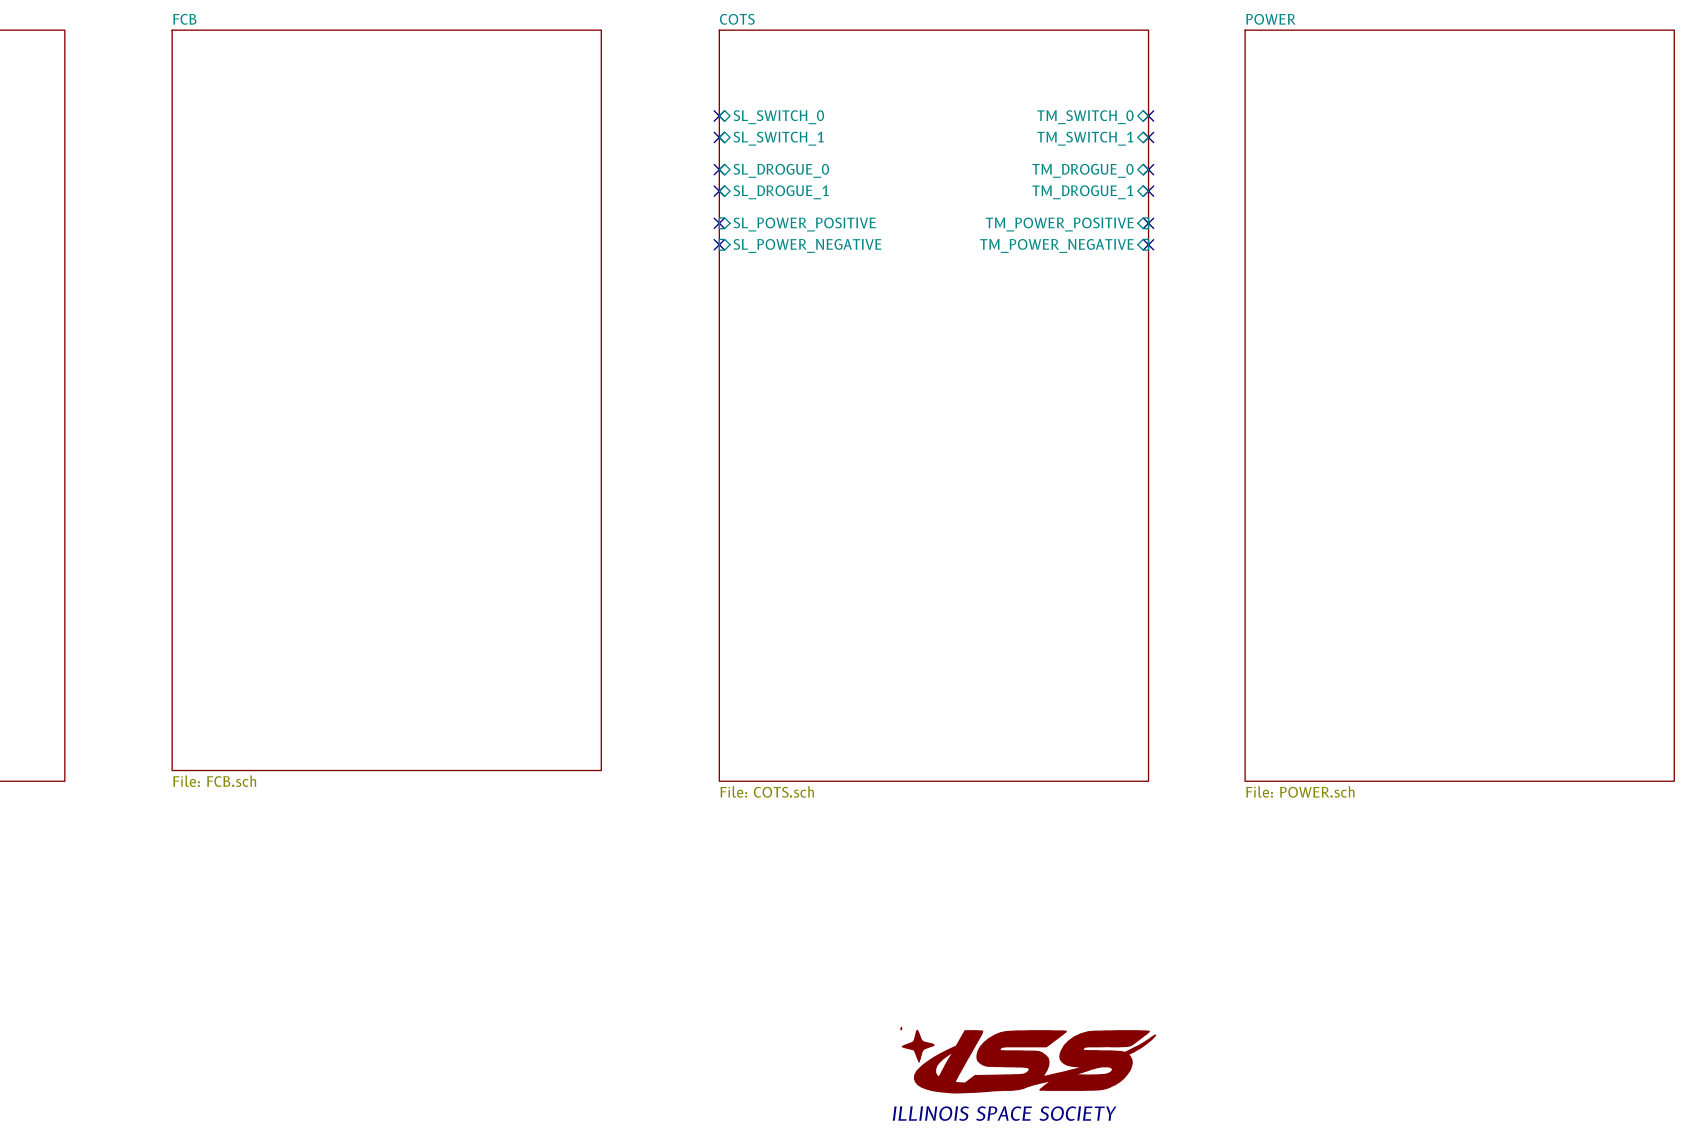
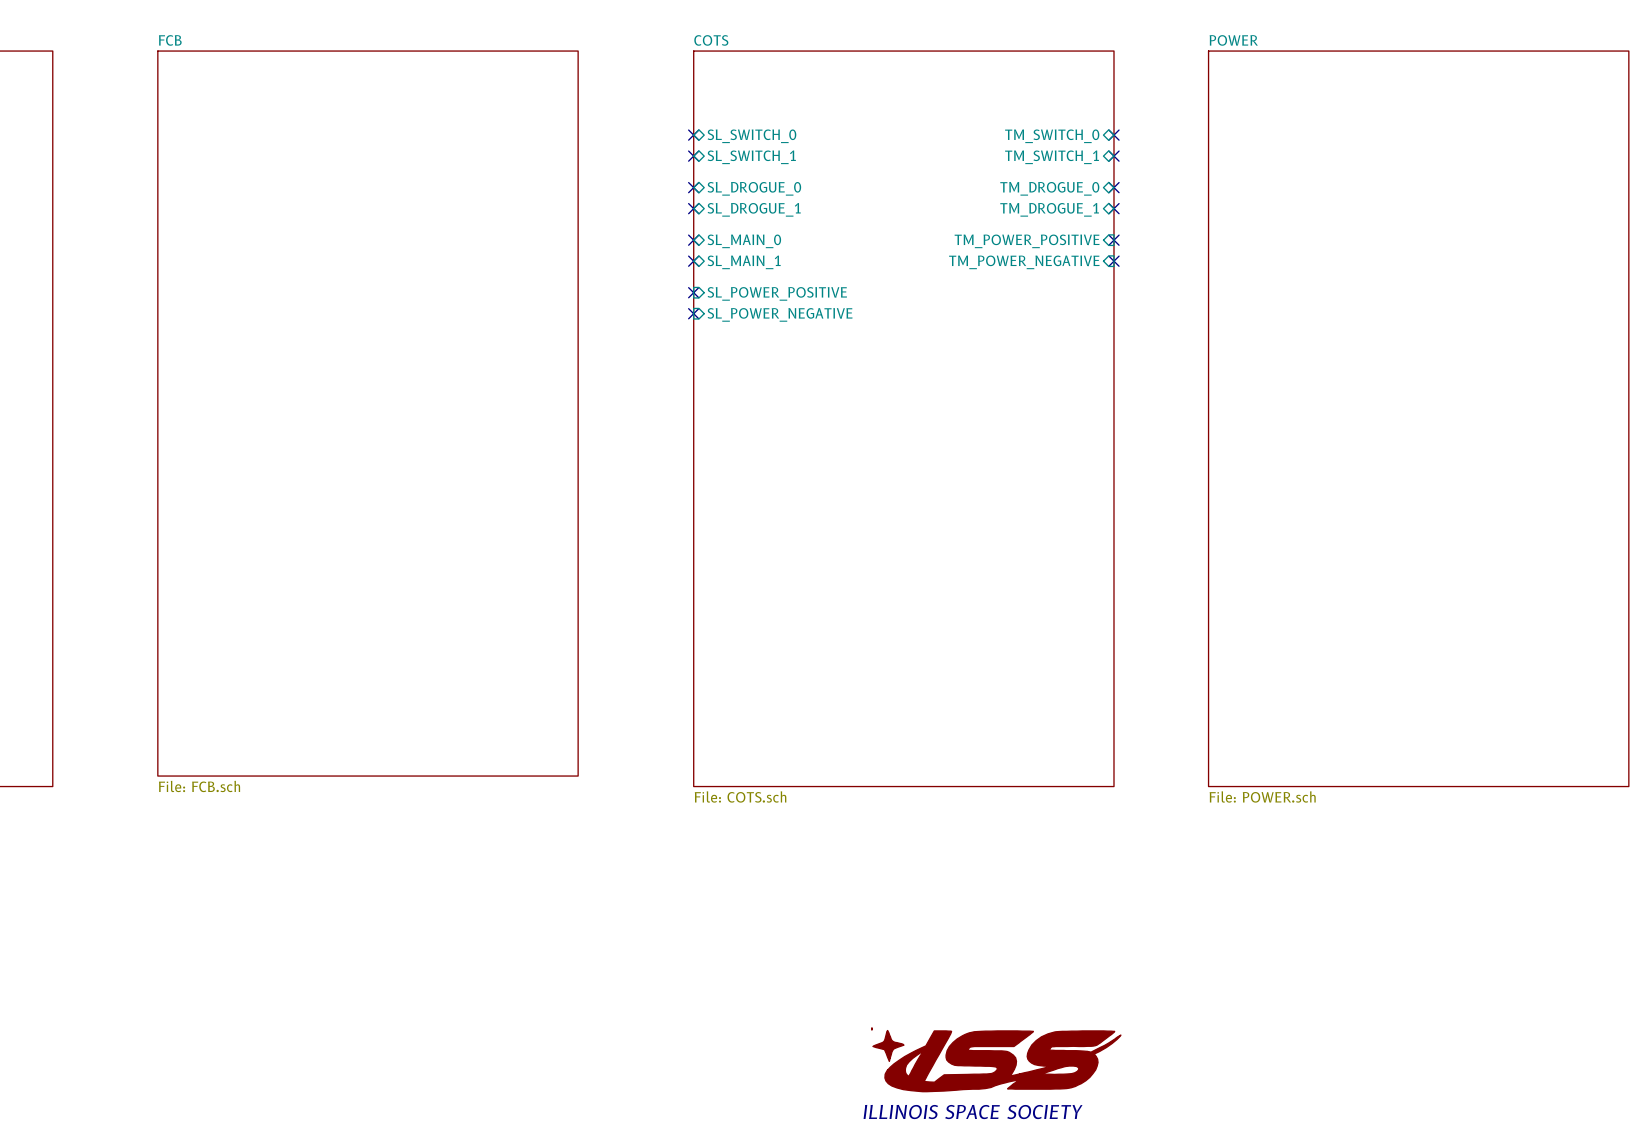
sheet pin shape: input (804, 224) -> bidirectional (744, 241)
sheet pin: SL_POWER_POSITIVE (804, 224) -> SL_MAIN_0 (744, 241)
sheet pin shape: input (807, 245) -> bidirectional (744, 262)
sheet pin: SL_POWER_NEGATIVE (807, 245) -> SL_MAIN_1 (744, 262)
no-connect mark: none -> (693, 292)
sheet pin: none -> SL_POWER_POSITIVE (777, 293)
no-connect mark: none -> (693, 313)
sheet pin: none -> SL_POWER_NEGATIVE (780, 314)

